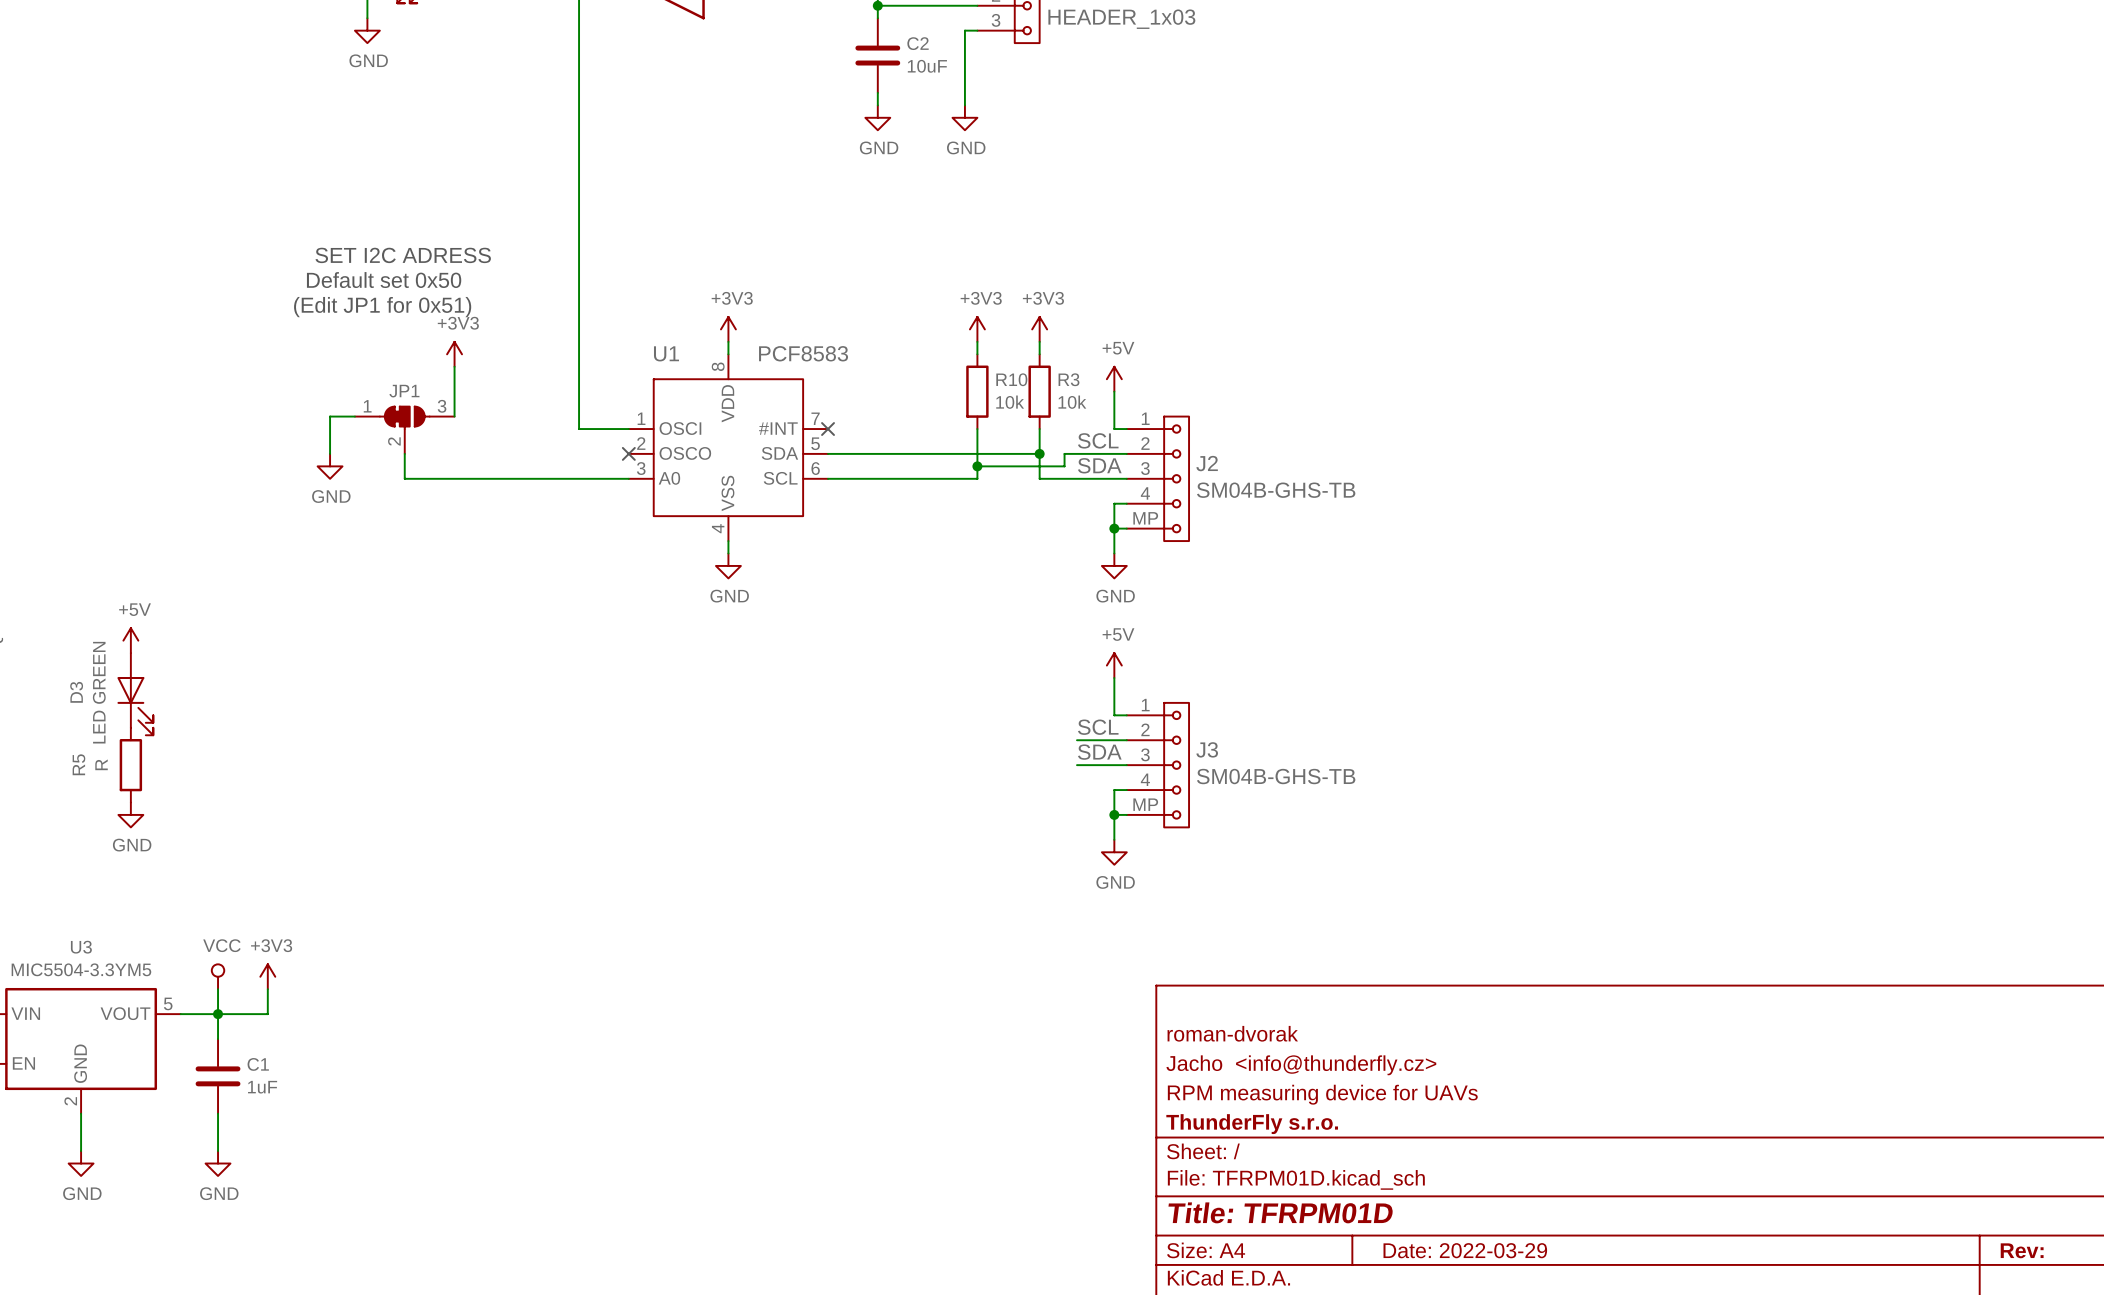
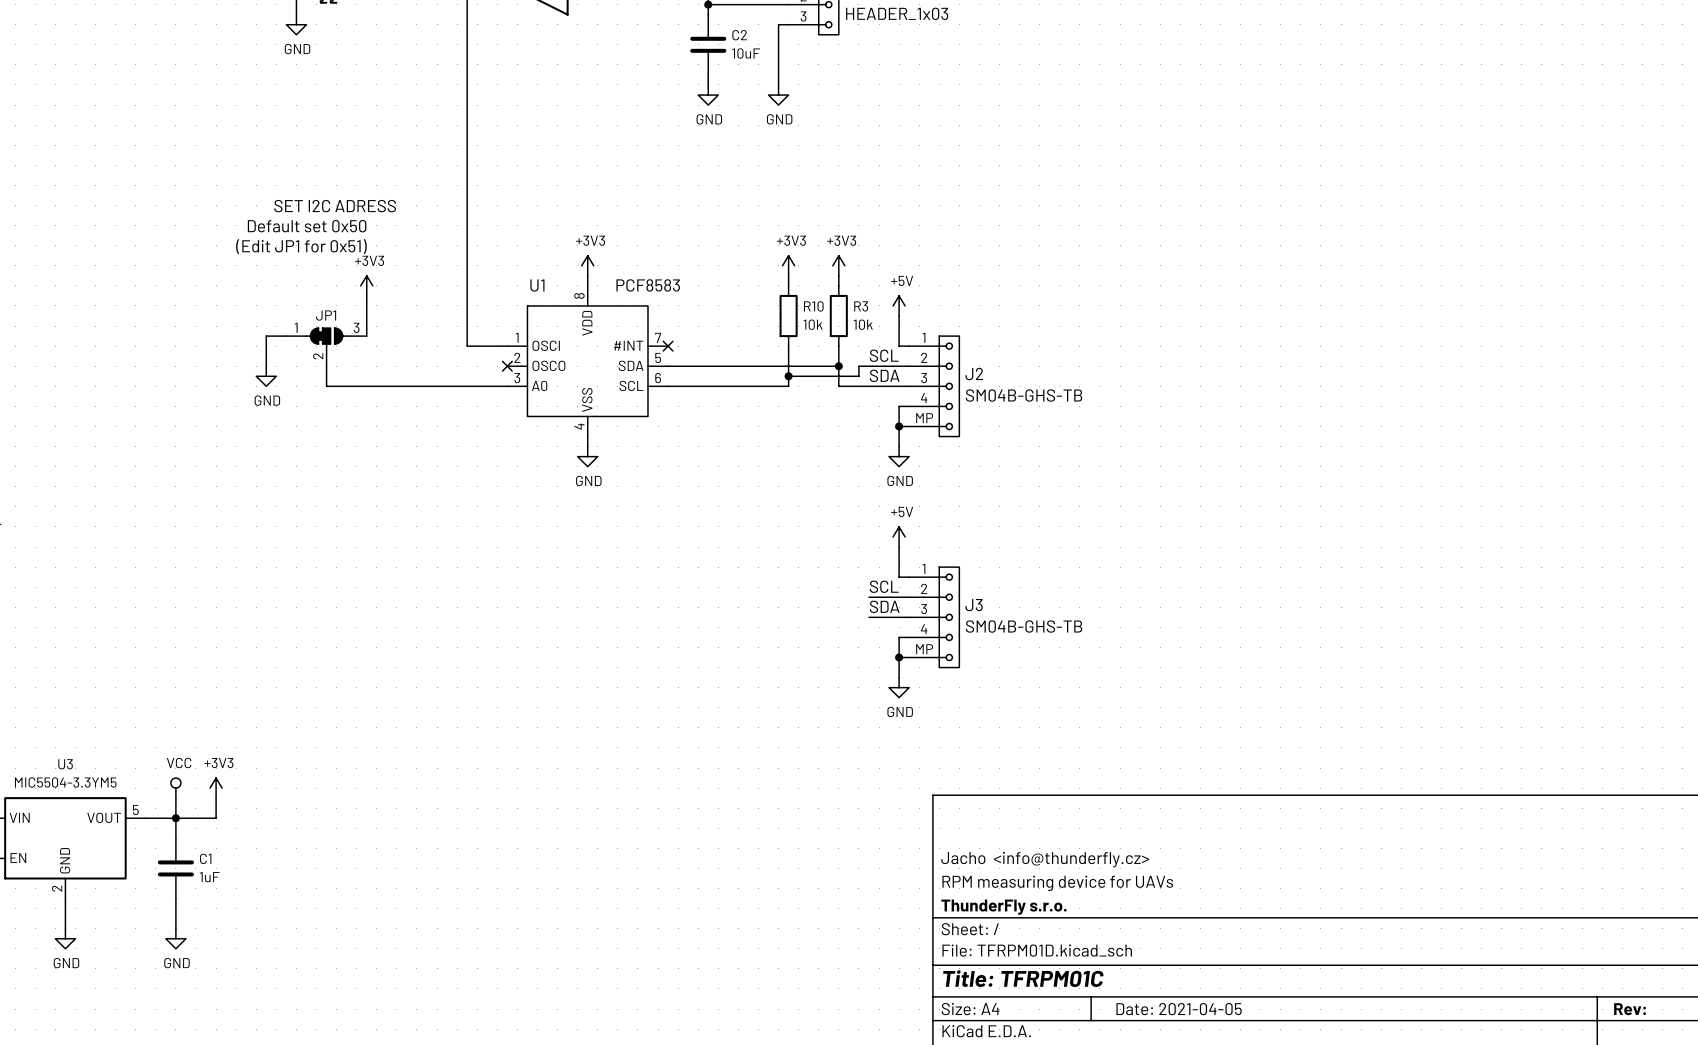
power symbol: +5V (130, 640) -> none
D3: LED GREEN (135, 694) -> none
R5: R (130, 765) -> none
power symbol: GND (130, 814) -> none
title block: roman-dvorak (1232, 1033) -> none
title block: Title: TFRPM01D (1280, 1212) -> Title: TFRPM01C (1023, 978)
title block: Date: 2022-03-29 (1465, 1250) -> Date: 2021-04-05 (1179, 1009)

